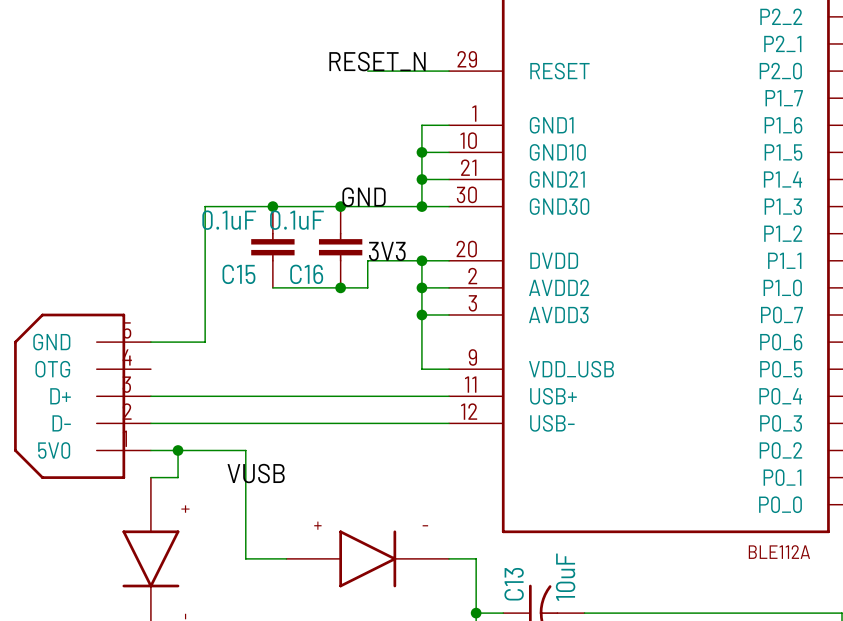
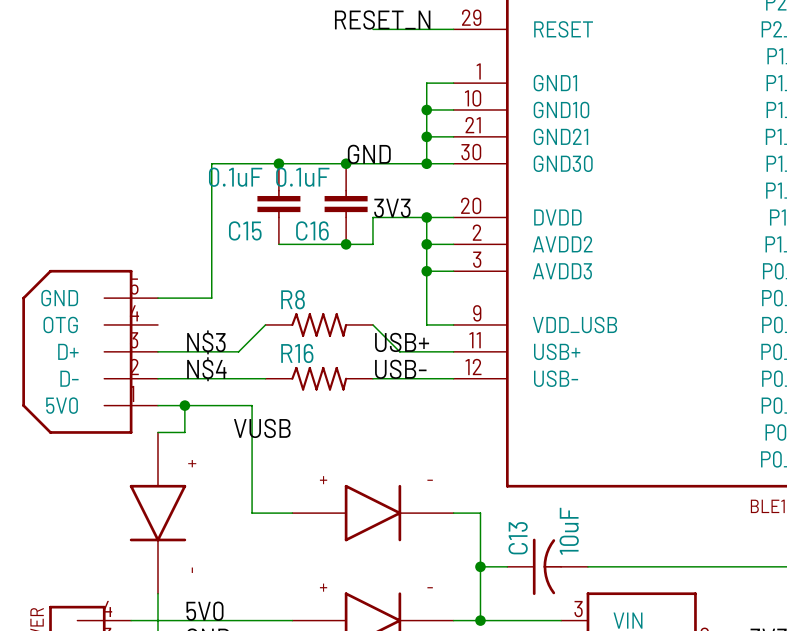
R8: none -> (319, 324)
wire: none -> (372, 324) (399, 351)
label: none -> N$3 (206, 342)
label: none -> USB+ (402, 342)
wire: (232, 396) (394, 396) -> (238, 351) (265, 324)
label: none -> N$4 (206, 369)
label: none -> USB- (400, 369)
R16: none -> (319, 378)

